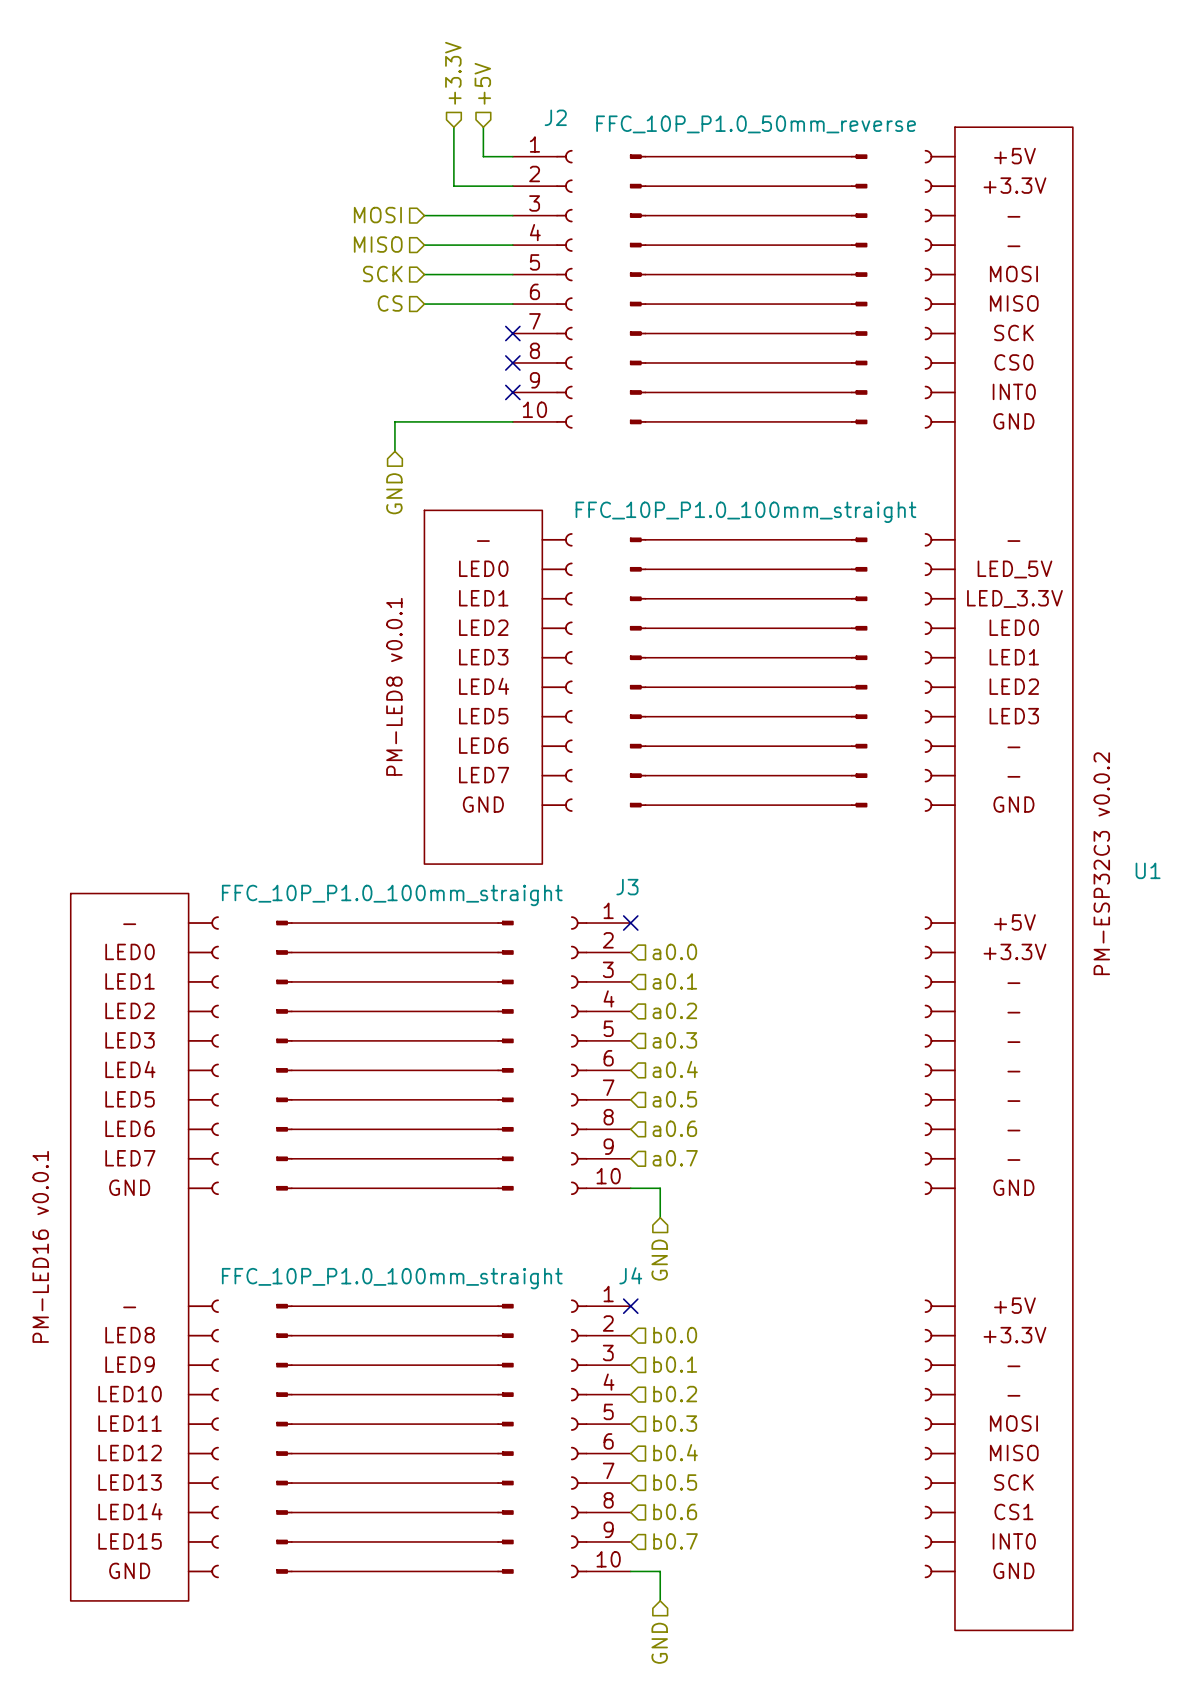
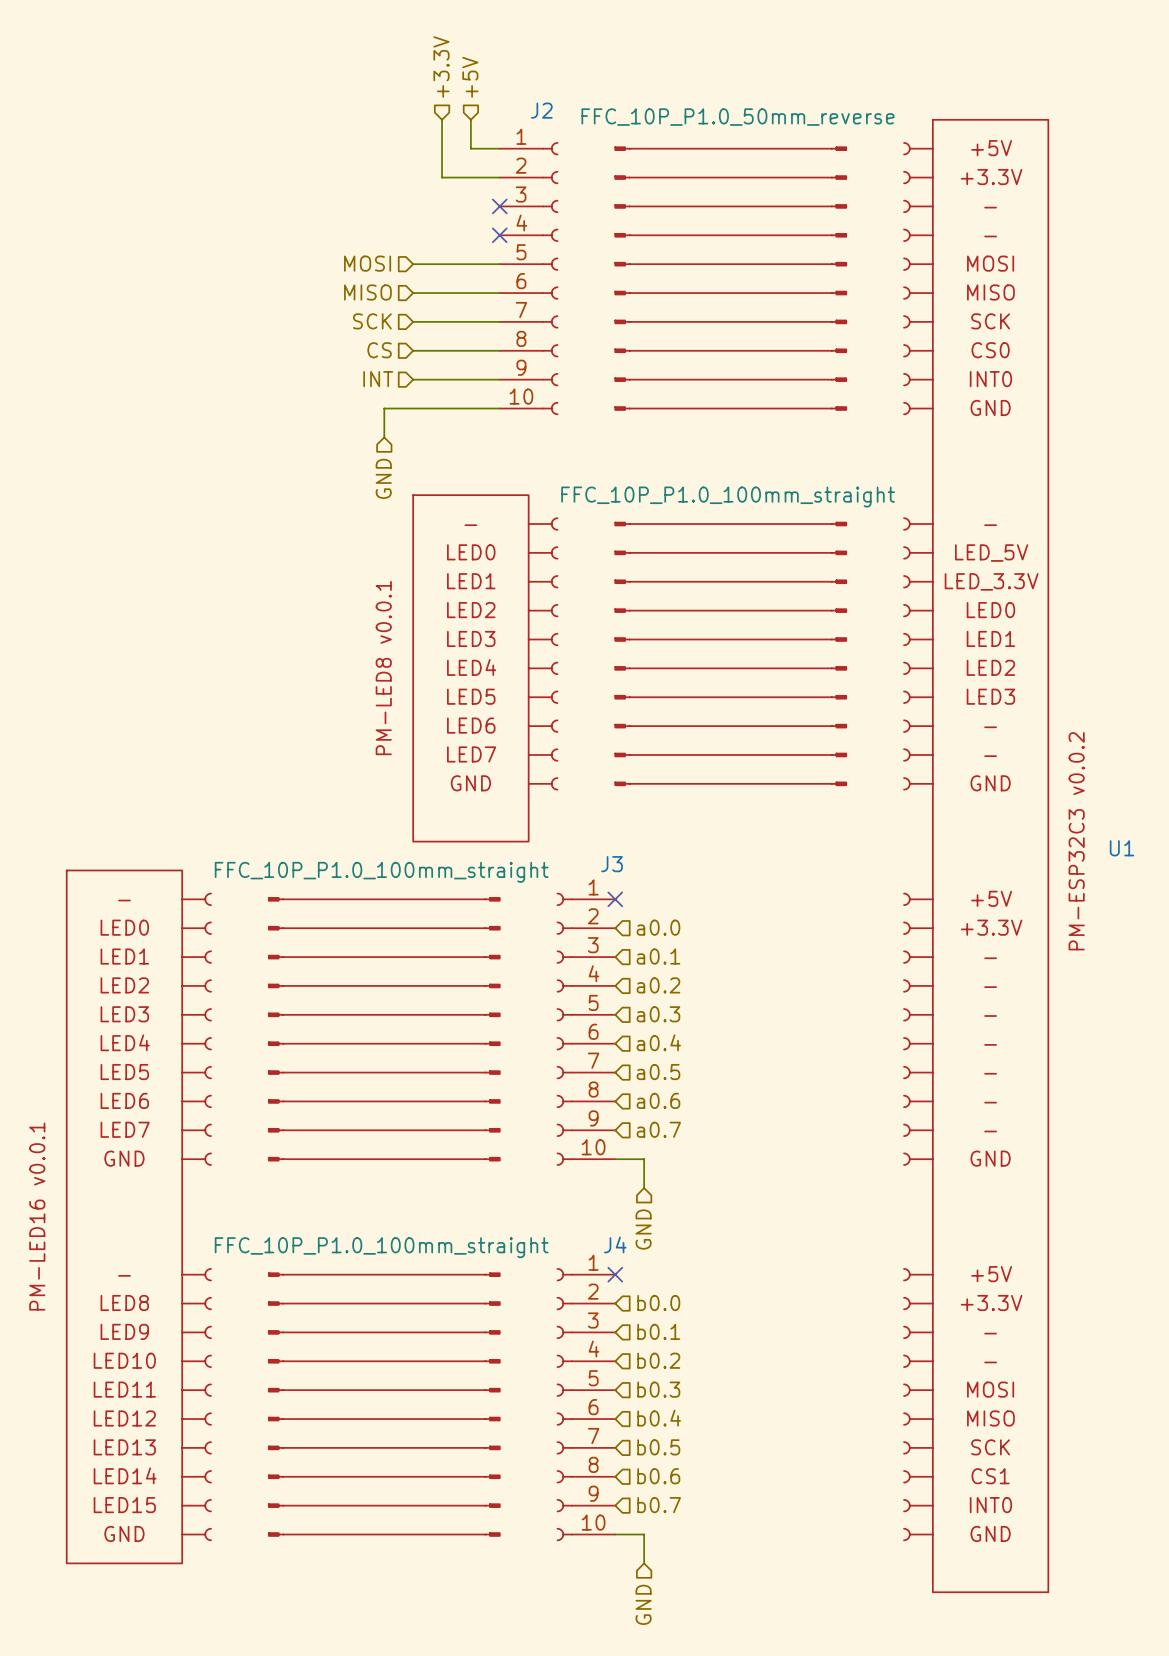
hierarchical label: MOSI (377, 215) -> none
wire: (424, 215) (512, 215) -> (413, 321) (499, 321)
no-connect mark: none -> (499, 206)
hierarchical label: MISO (378, 244) -> none
wire: (424, 245) (512, 245) -> (413, 350) (499, 350)
no-connect mark: none -> (499, 235)
hierarchical label: SCK (382, 274) -> MOSI (367, 263)
hierarchical label: CS (390, 303) -> MISO (367, 292)
hierarchical label: none -> SCK (372, 321)
no-connect mark: (512, 333) -> none
hierarchical label: none -> CS (379, 350)
no-connect mark: (512, 362) -> none
hierarchical label: none -> INT (378, 379)
wire: none -> (413, 379) (499, 379)
no-connect mark: (512, 392) -> none

